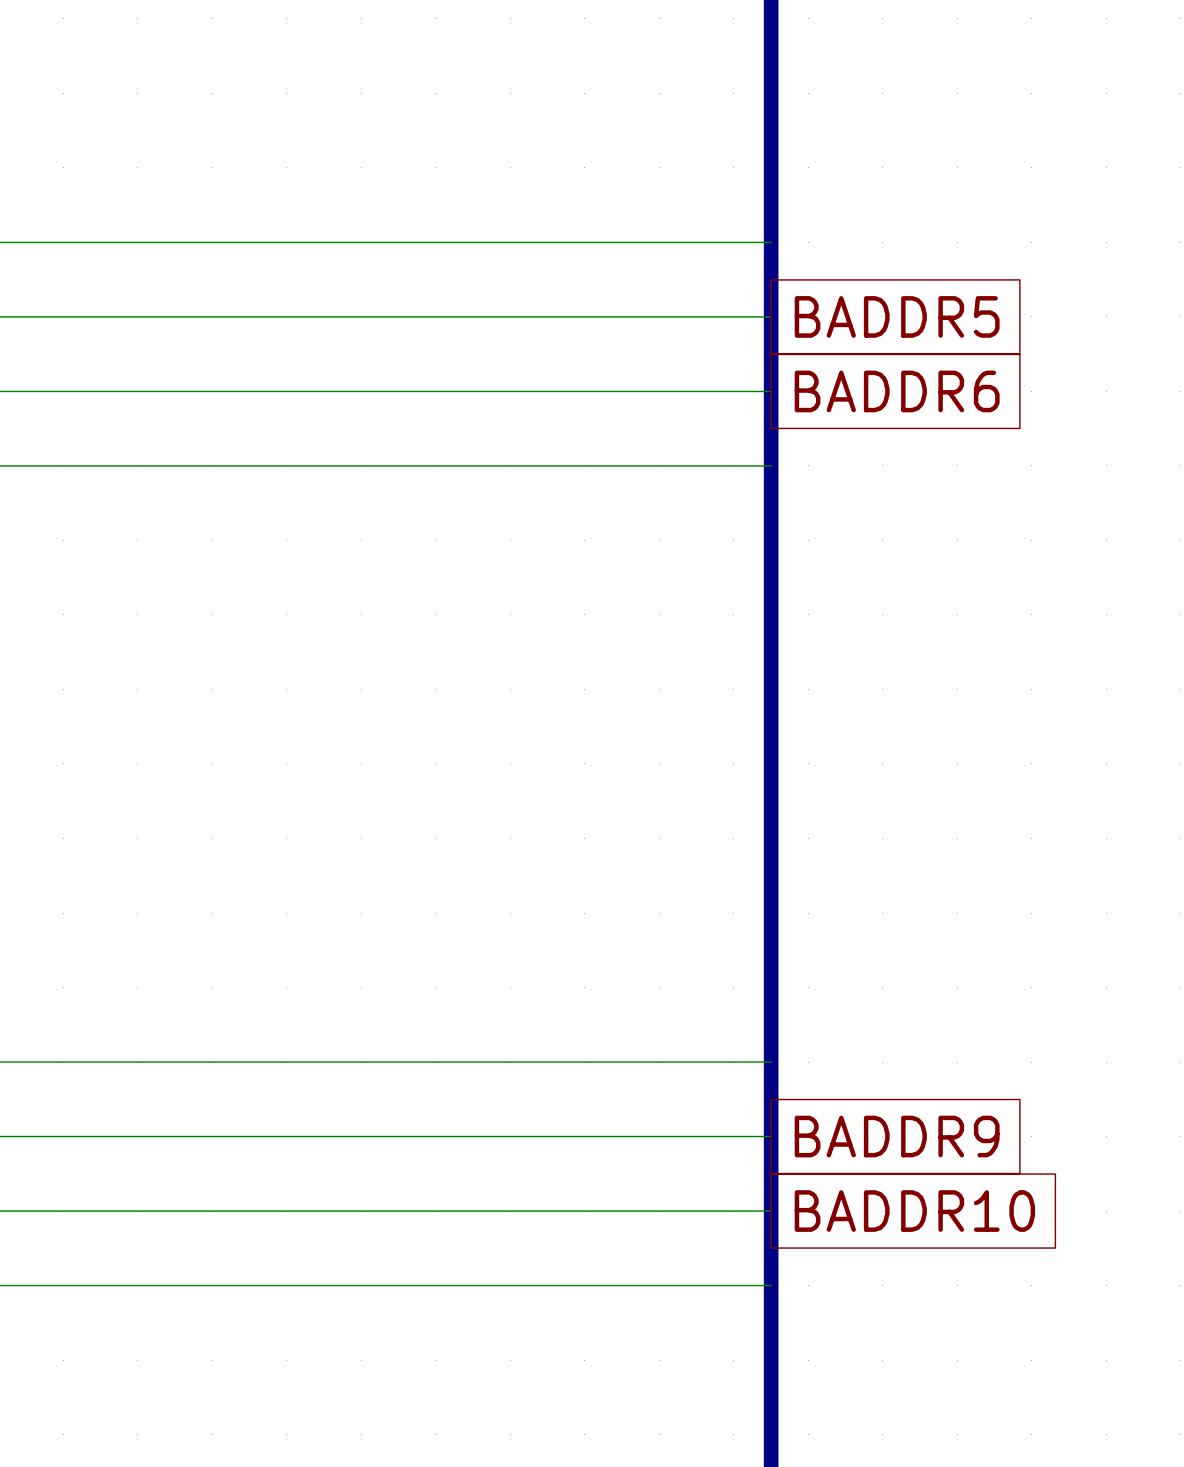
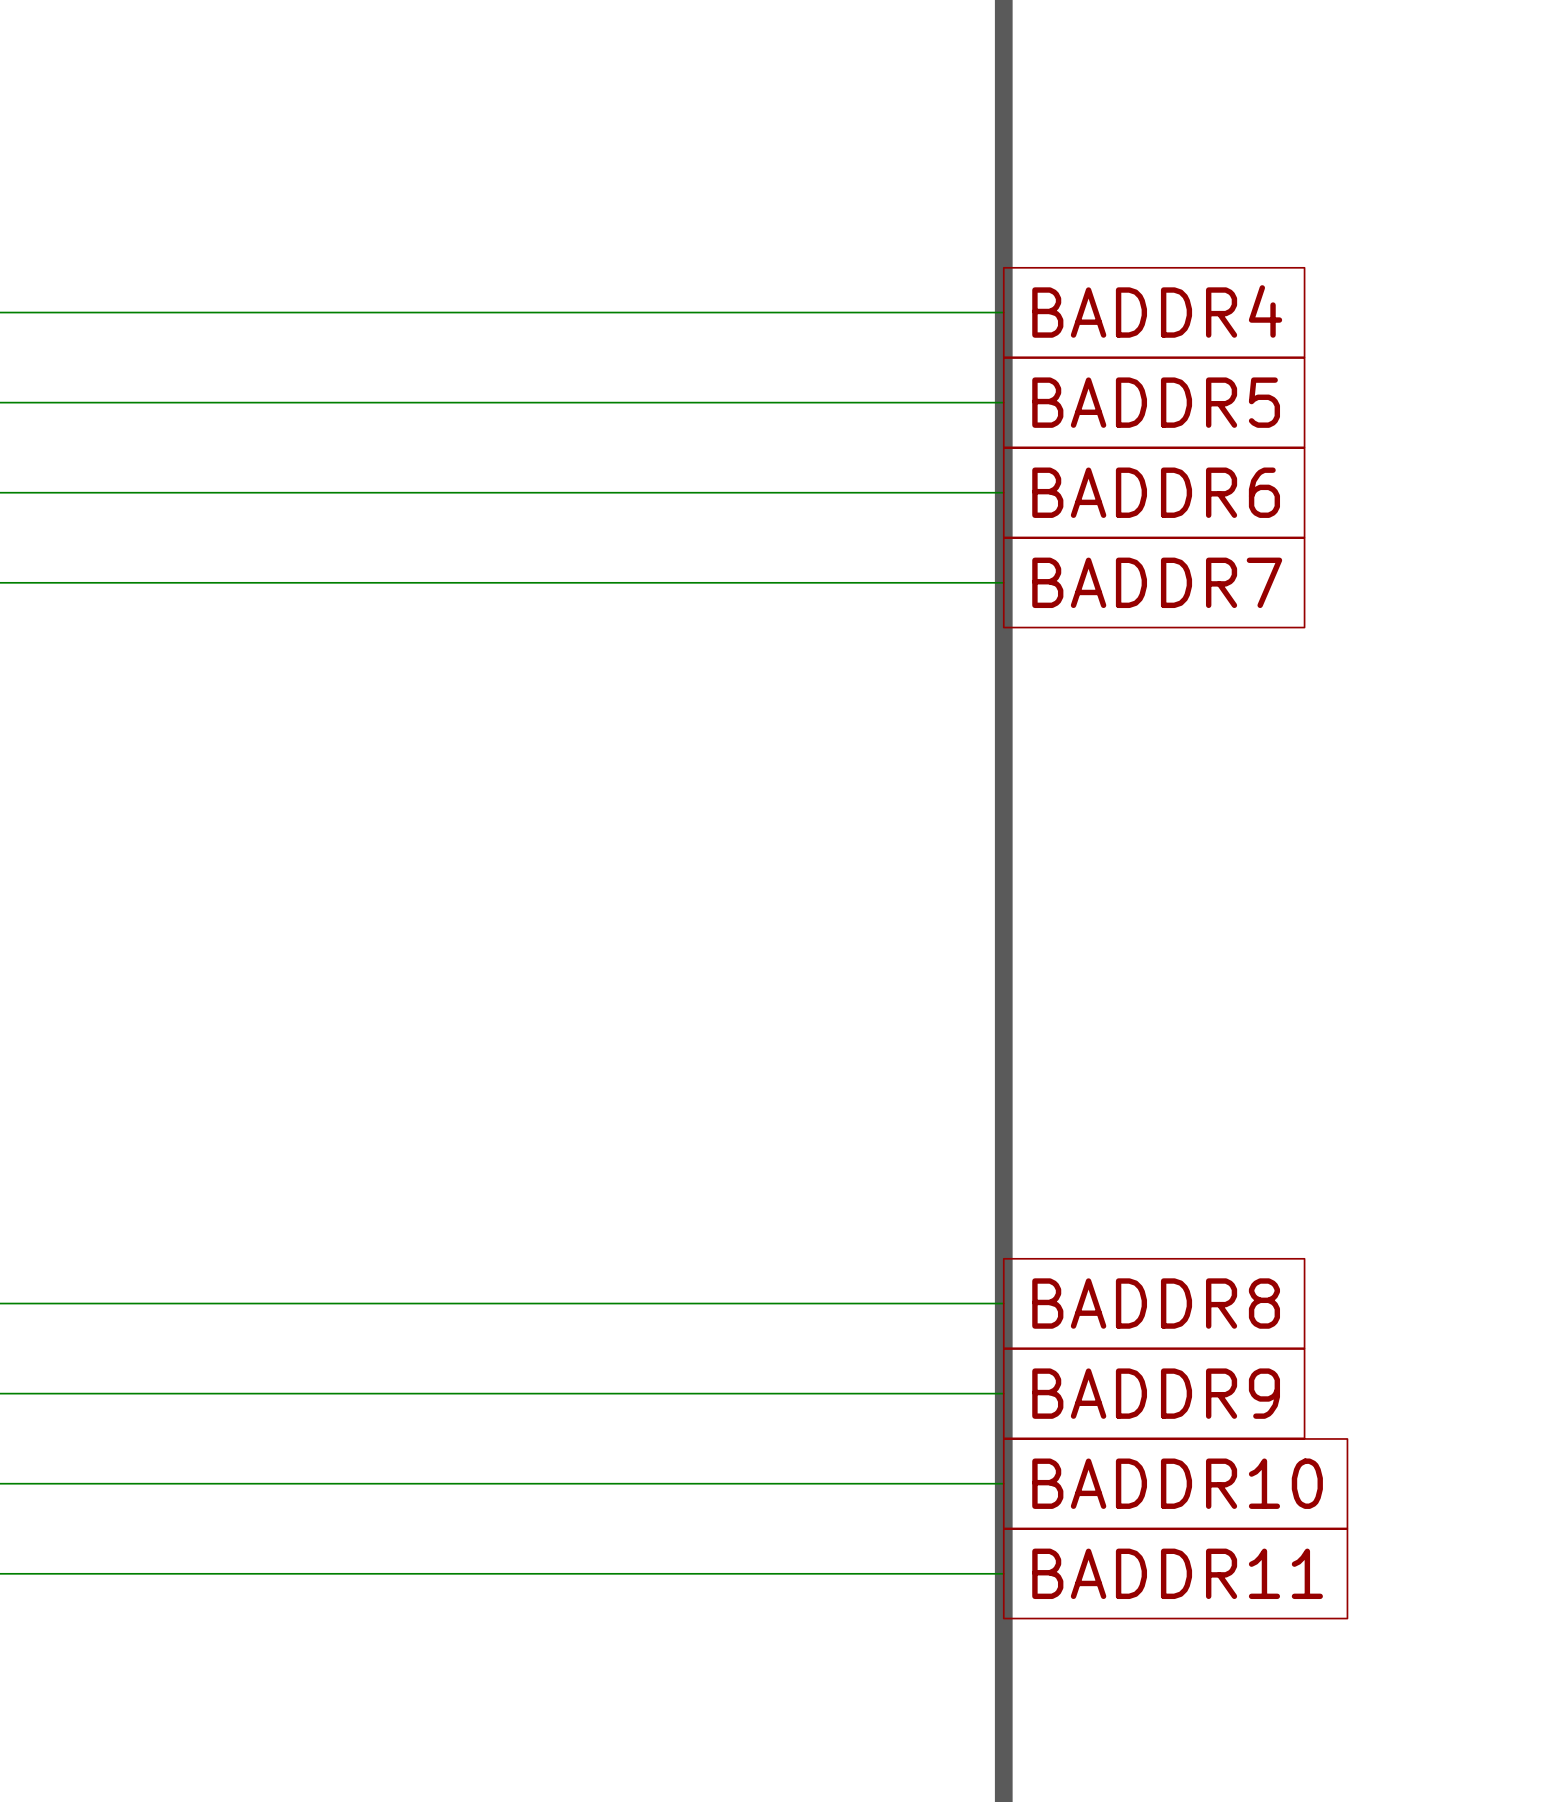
global label: none -> BADDR4 (1157, 311)
global label: none -> BADDR7 (1157, 582)
global label: none -> BADDR8 (1156, 1303)
global label: none -> BADDR11 (1177, 1573)

